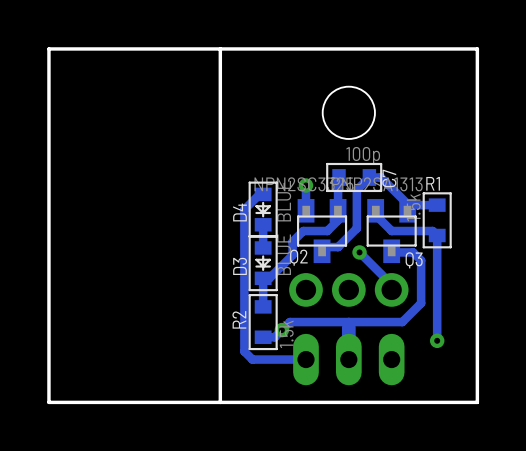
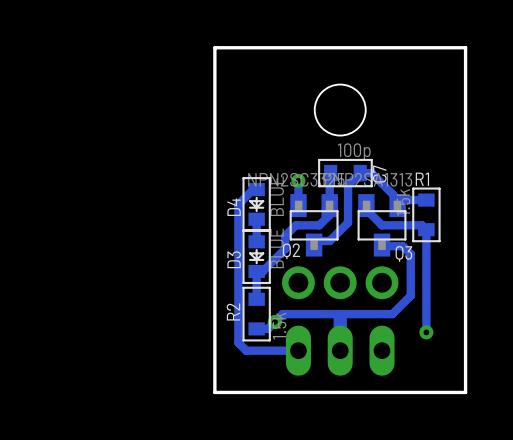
board edge: (220, 48) (48, 48) (48, 402) (220, 402) -> none
track: (359, 252) (391, 284) (391, 289) -> none
via: (359, 252) -> none

